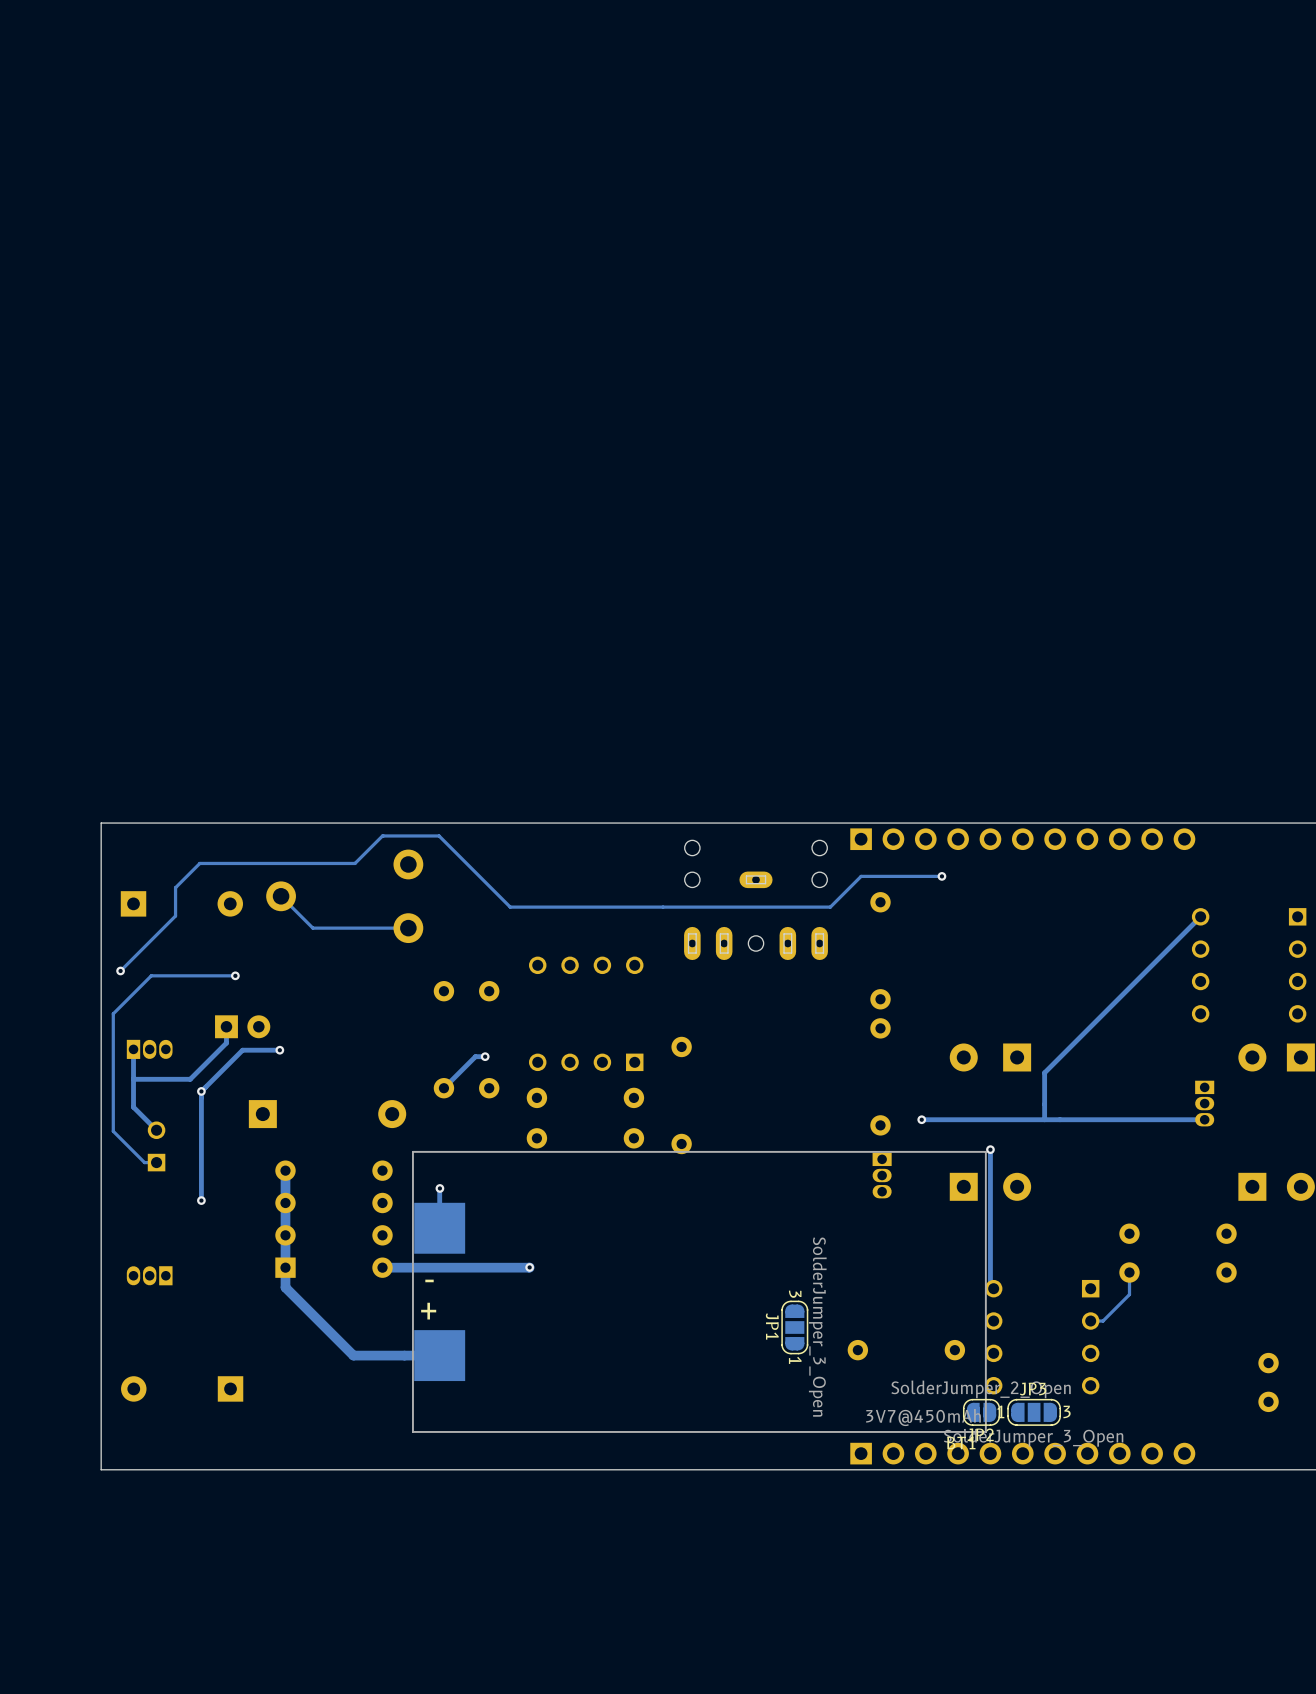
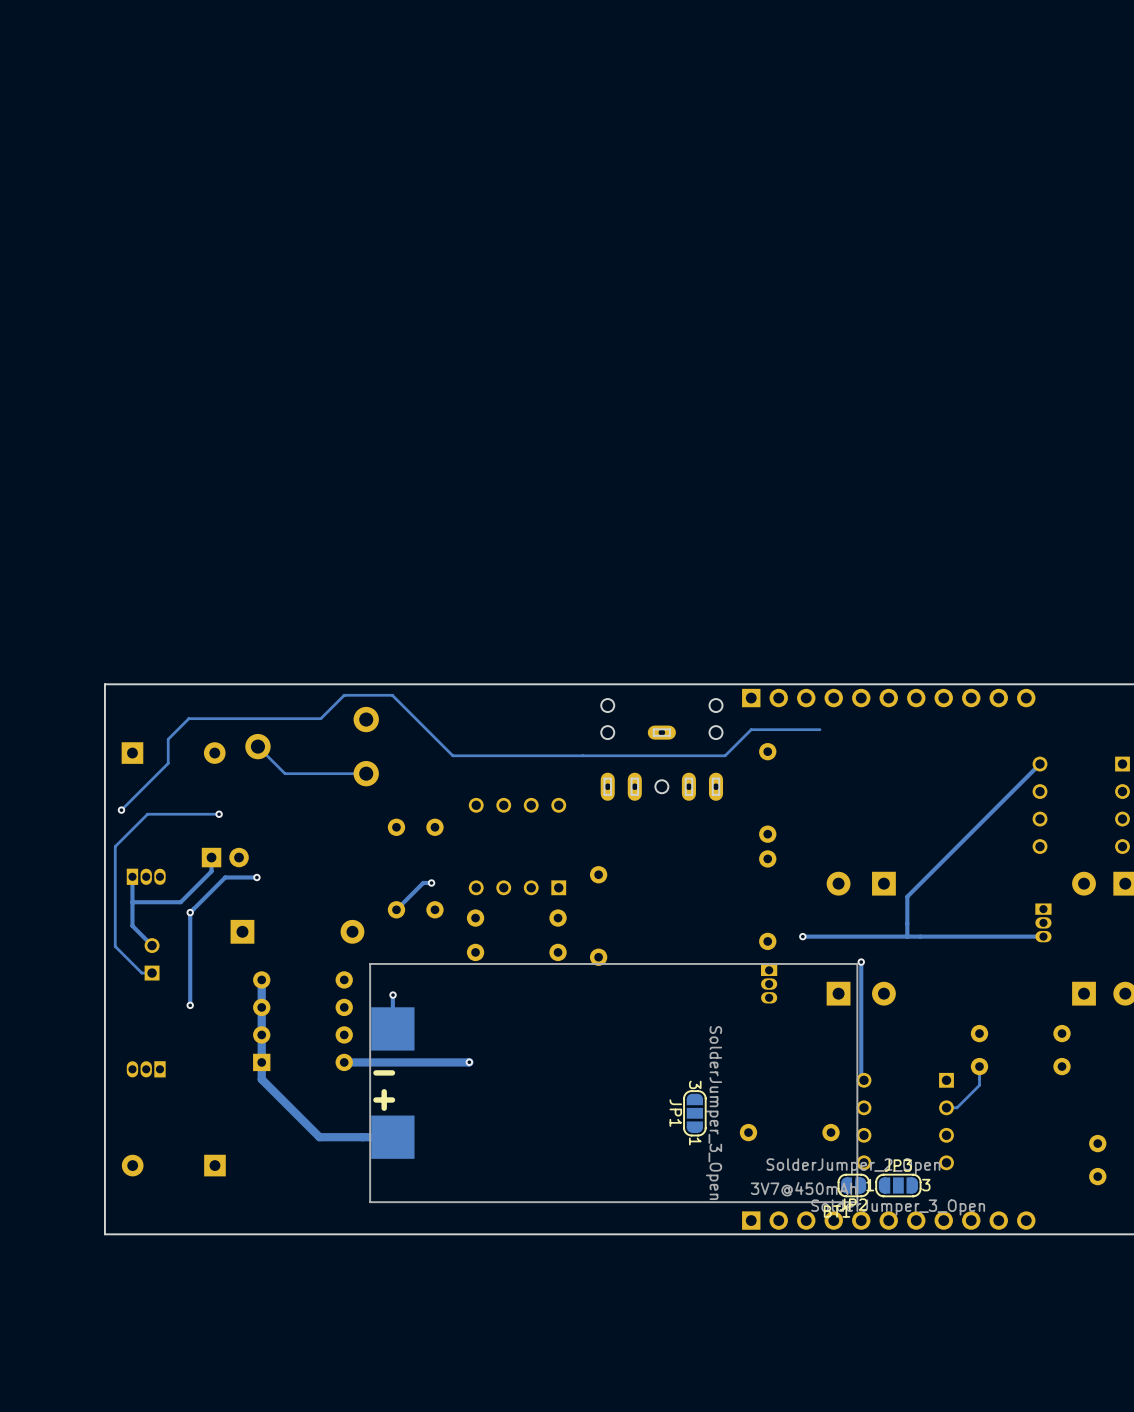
via: (941, 876) -> none

